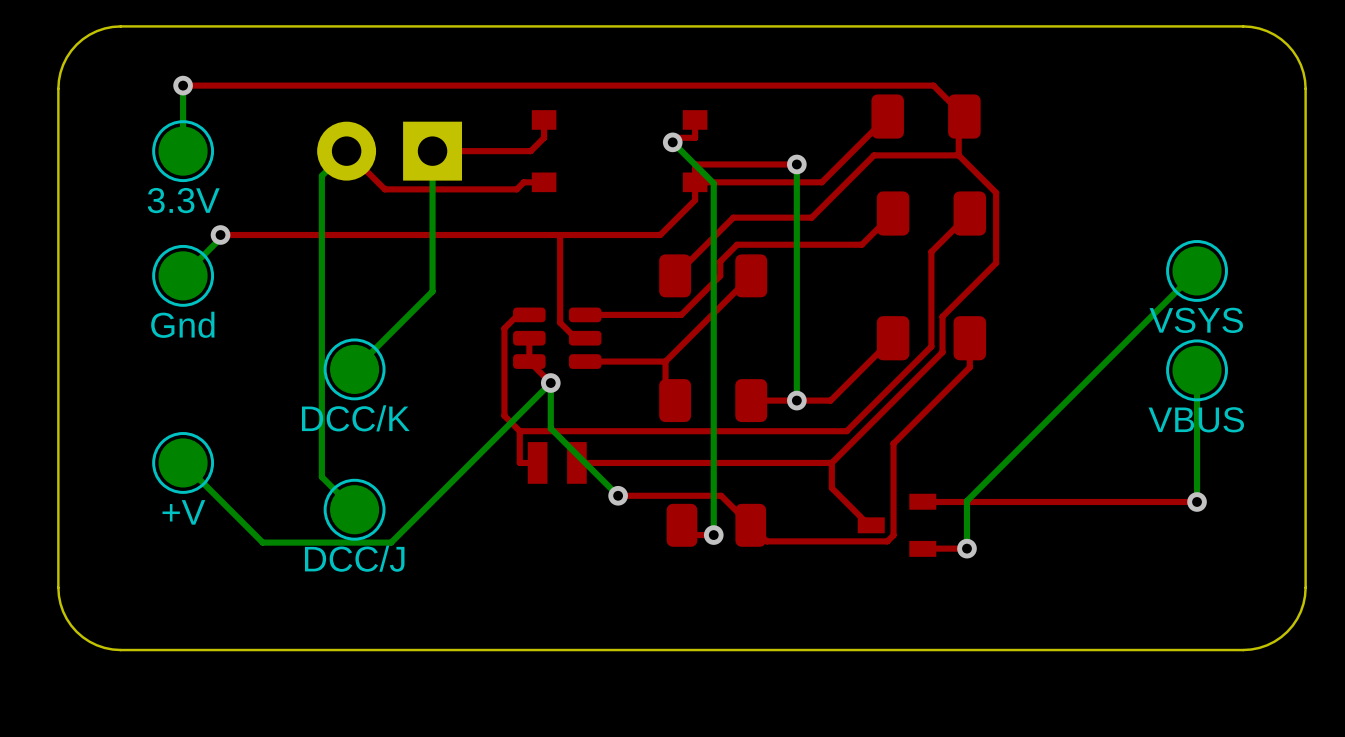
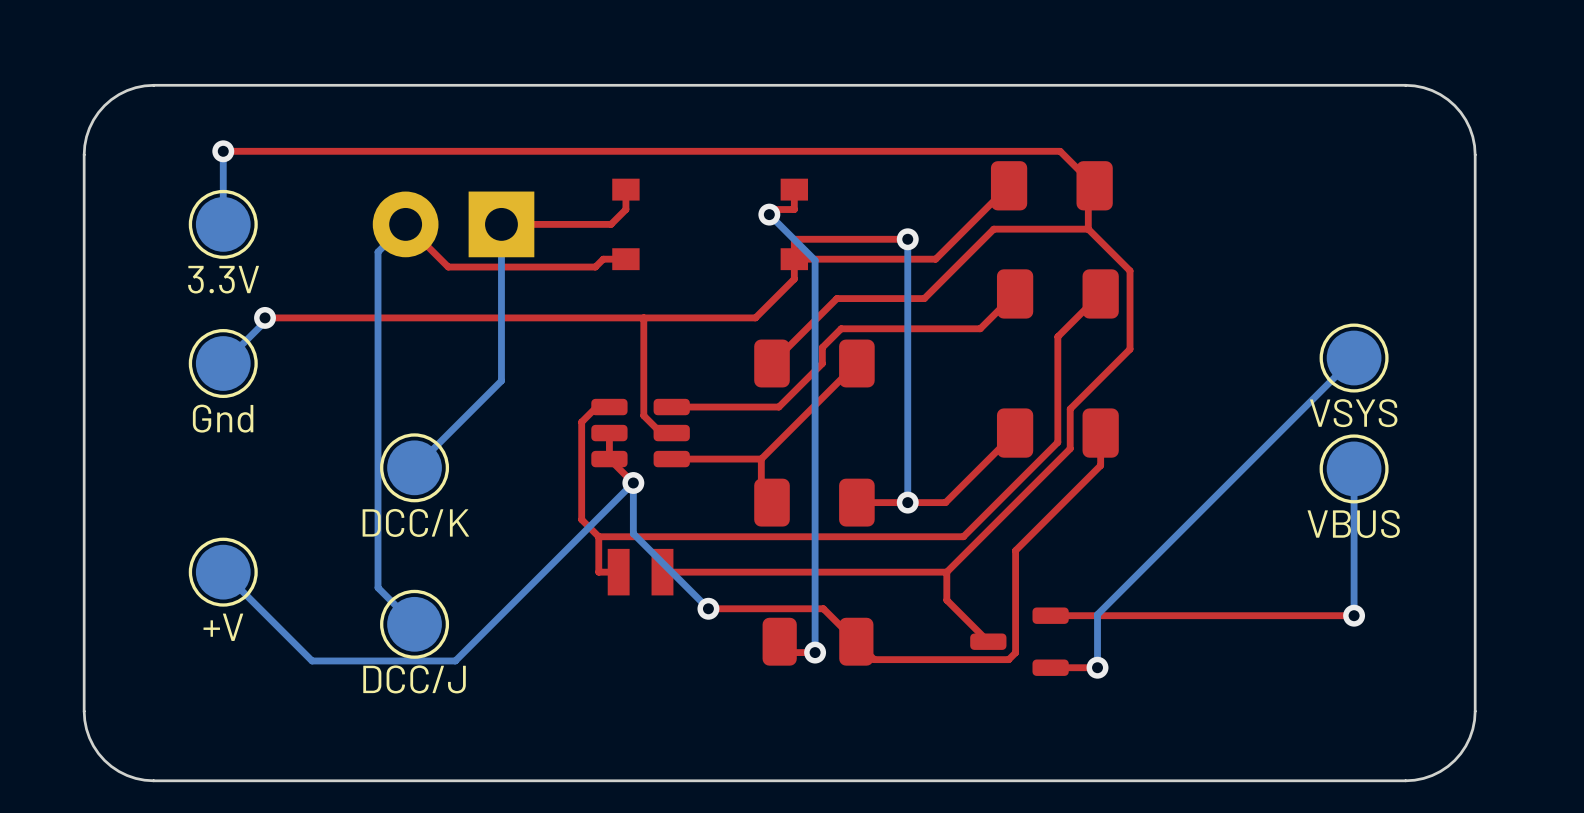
part footprint: [857, 493, 937, 557] -> [970, 607, 1069, 676]

